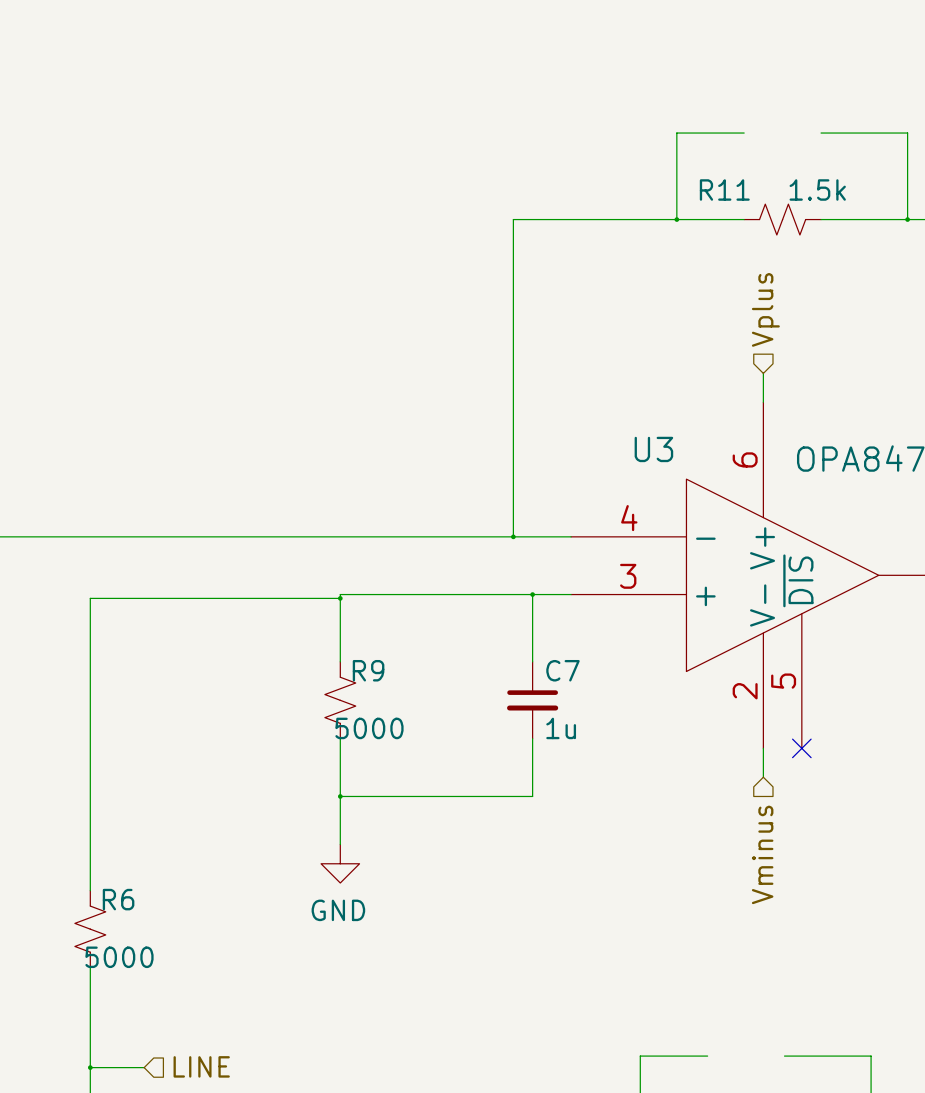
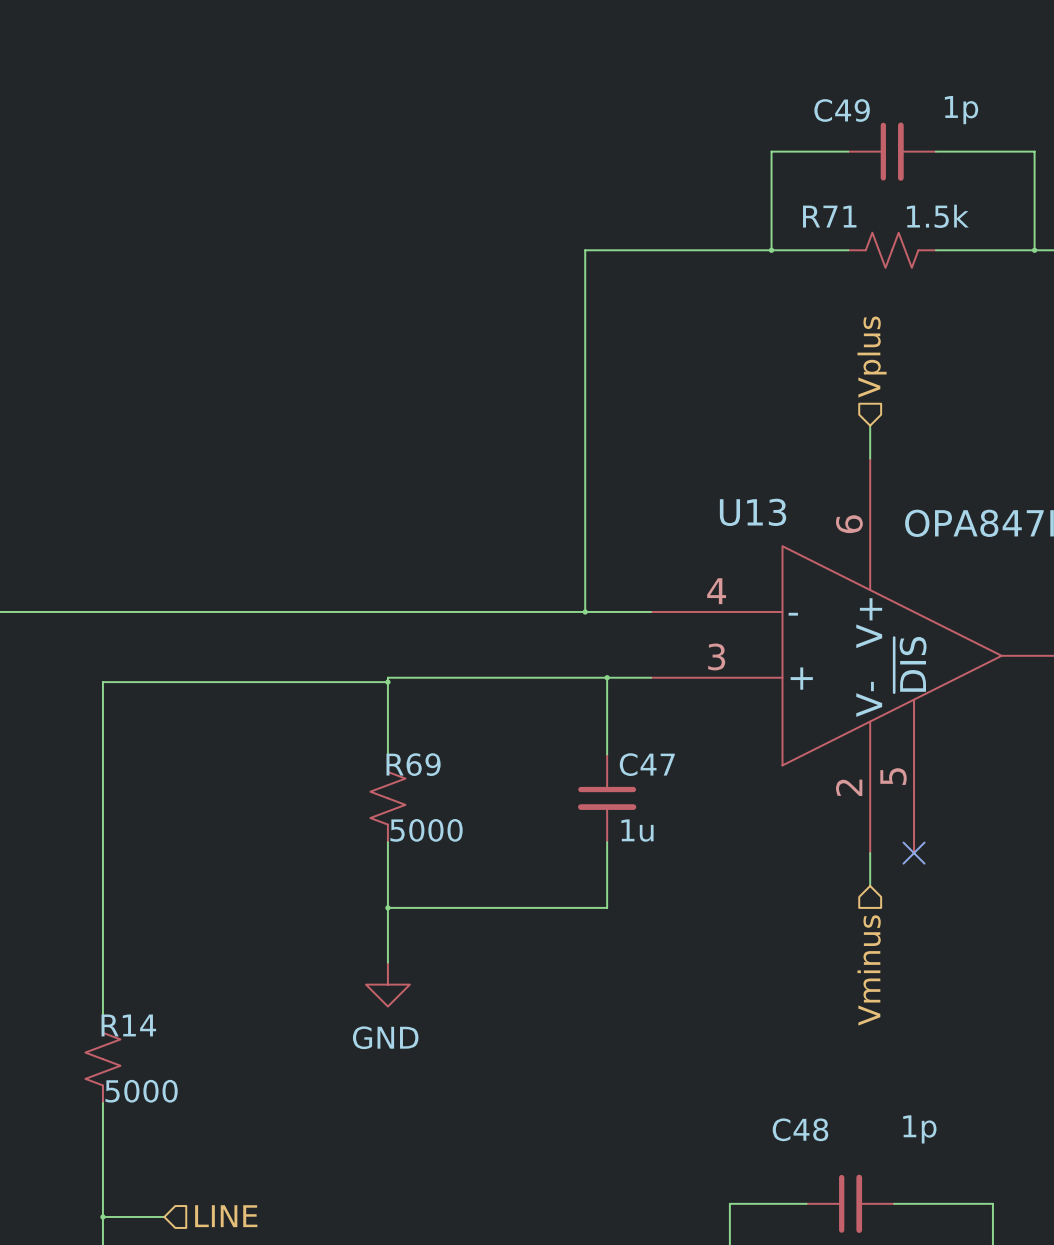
C49: none -> 1p (892, 151)
R11 name: R11 (724, 189) -> R71 (829, 216)
U3 name: U3 (653, 449) -> U13 (753, 512)
R9 name: R9 (368, 670) -> R69 (413, 764)
C7 name: C7 (562, 670) -> C47 (647, 764)
R6 name: R6 (118, 899) -> R14 (128, 1025)
C48: none -> 1p (850, 1203)

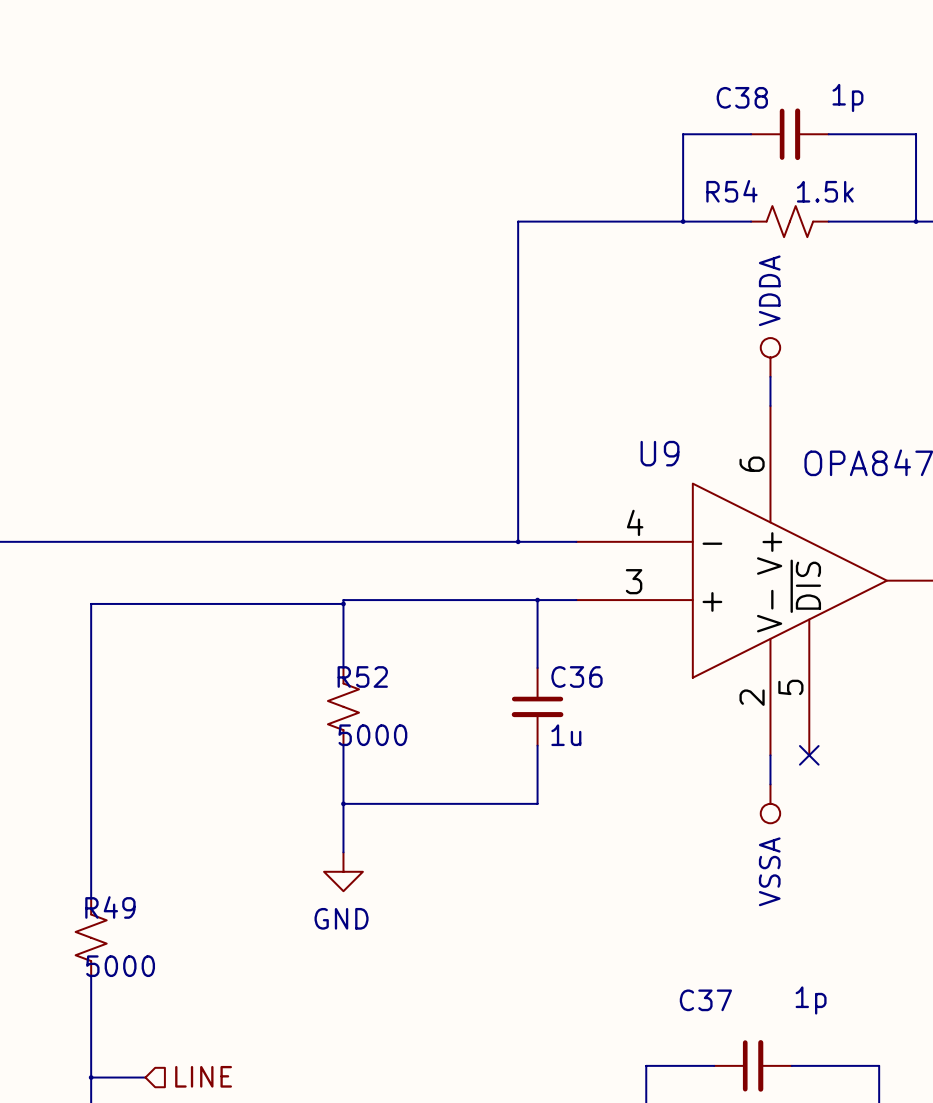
C49 name: C49 (842, 110) -> C38 (742, 97)
R71 name: R71 (829, 216) -> R54 (731, 191)
hierarchical label: Vplus (872, 357) -> none
power symbol: none -> VDDA (770, 357)
U13 name: U13 (753, 512) -> U9 (659, 453)
R69 name: R69 (413, 764) -> R52 (362, 676)
C47 name: C47 (647, 764) -> C36 (576, 676)
power symbol: none -> VSSA (770, 803)
hierarchical label: Vminus (869, 970) -> none
R14 name: R14 (128, 1025) -> R49 (110, 907)
C48 name: C48 (800, 1129) -> C37 (705, 1000)

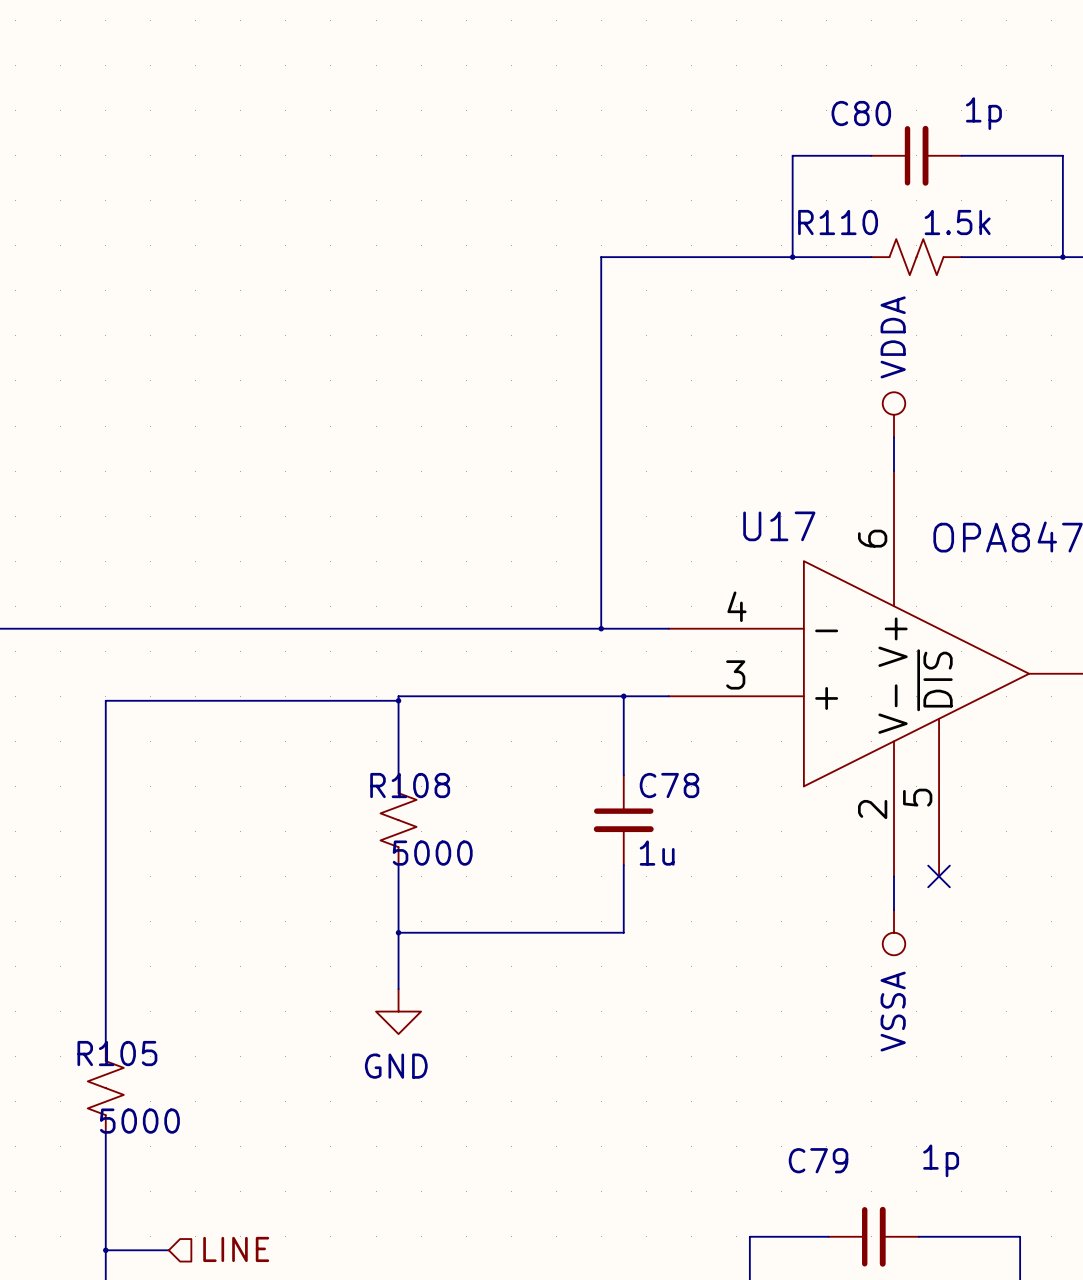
C38 name: C38 (742, 97) -> C80 (861, 113)
R54 name: R54 (731, 191) -> R110 (838, 222)
U9 name: U9 (659, 453) -> U17 (779, 526)
R52 name: R52 (362, 676) -> R108 (410, 785)
C36 name: C36 (576, 676) -> C78 (669, 785)
R49 name: R49 (110, 907) -> R105 (117, 1053)
C37 name: C37 (705, 1000) -> C79 (818, 1160)

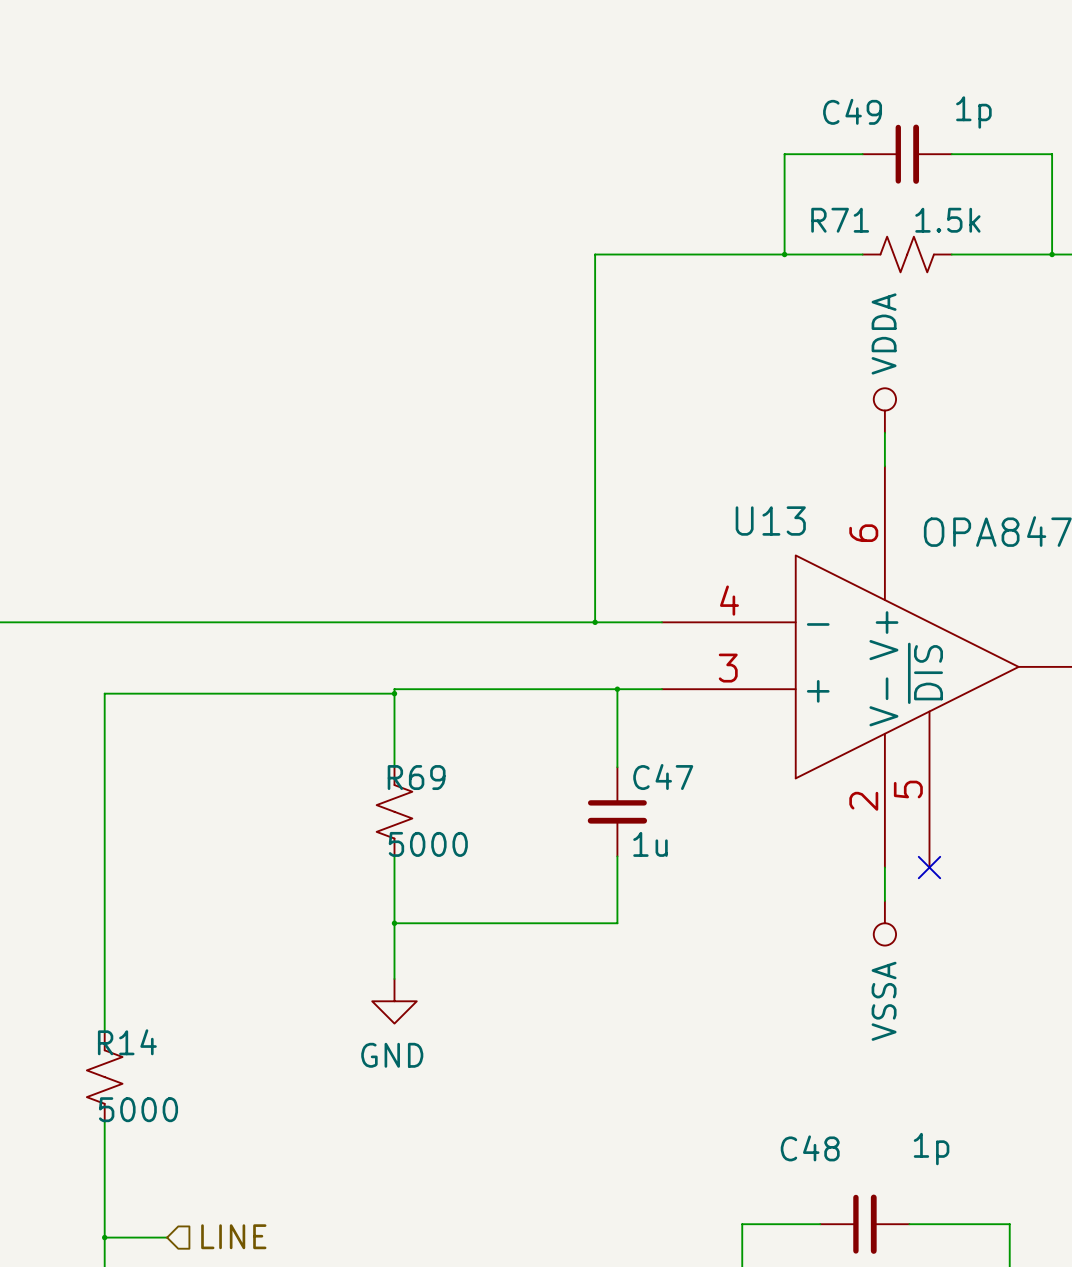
C80 name: C80 (861, 113) -> C49 (852, 111)
R110 name: R110 (838, 222) -> R71 (840, 220)
U17 name: U17 (779, 526) -> U13 (770, 521)
R108 name: R108 (410, 785) -> R69 (416, 777)
C78 name: C78 (669, 785) -> C47 (663, 777)
R105 name: R105 (117, 1053) -> R14 (127, 1042)
C79 name: C79 (818, 1160) -> C48 (810, 1148)

